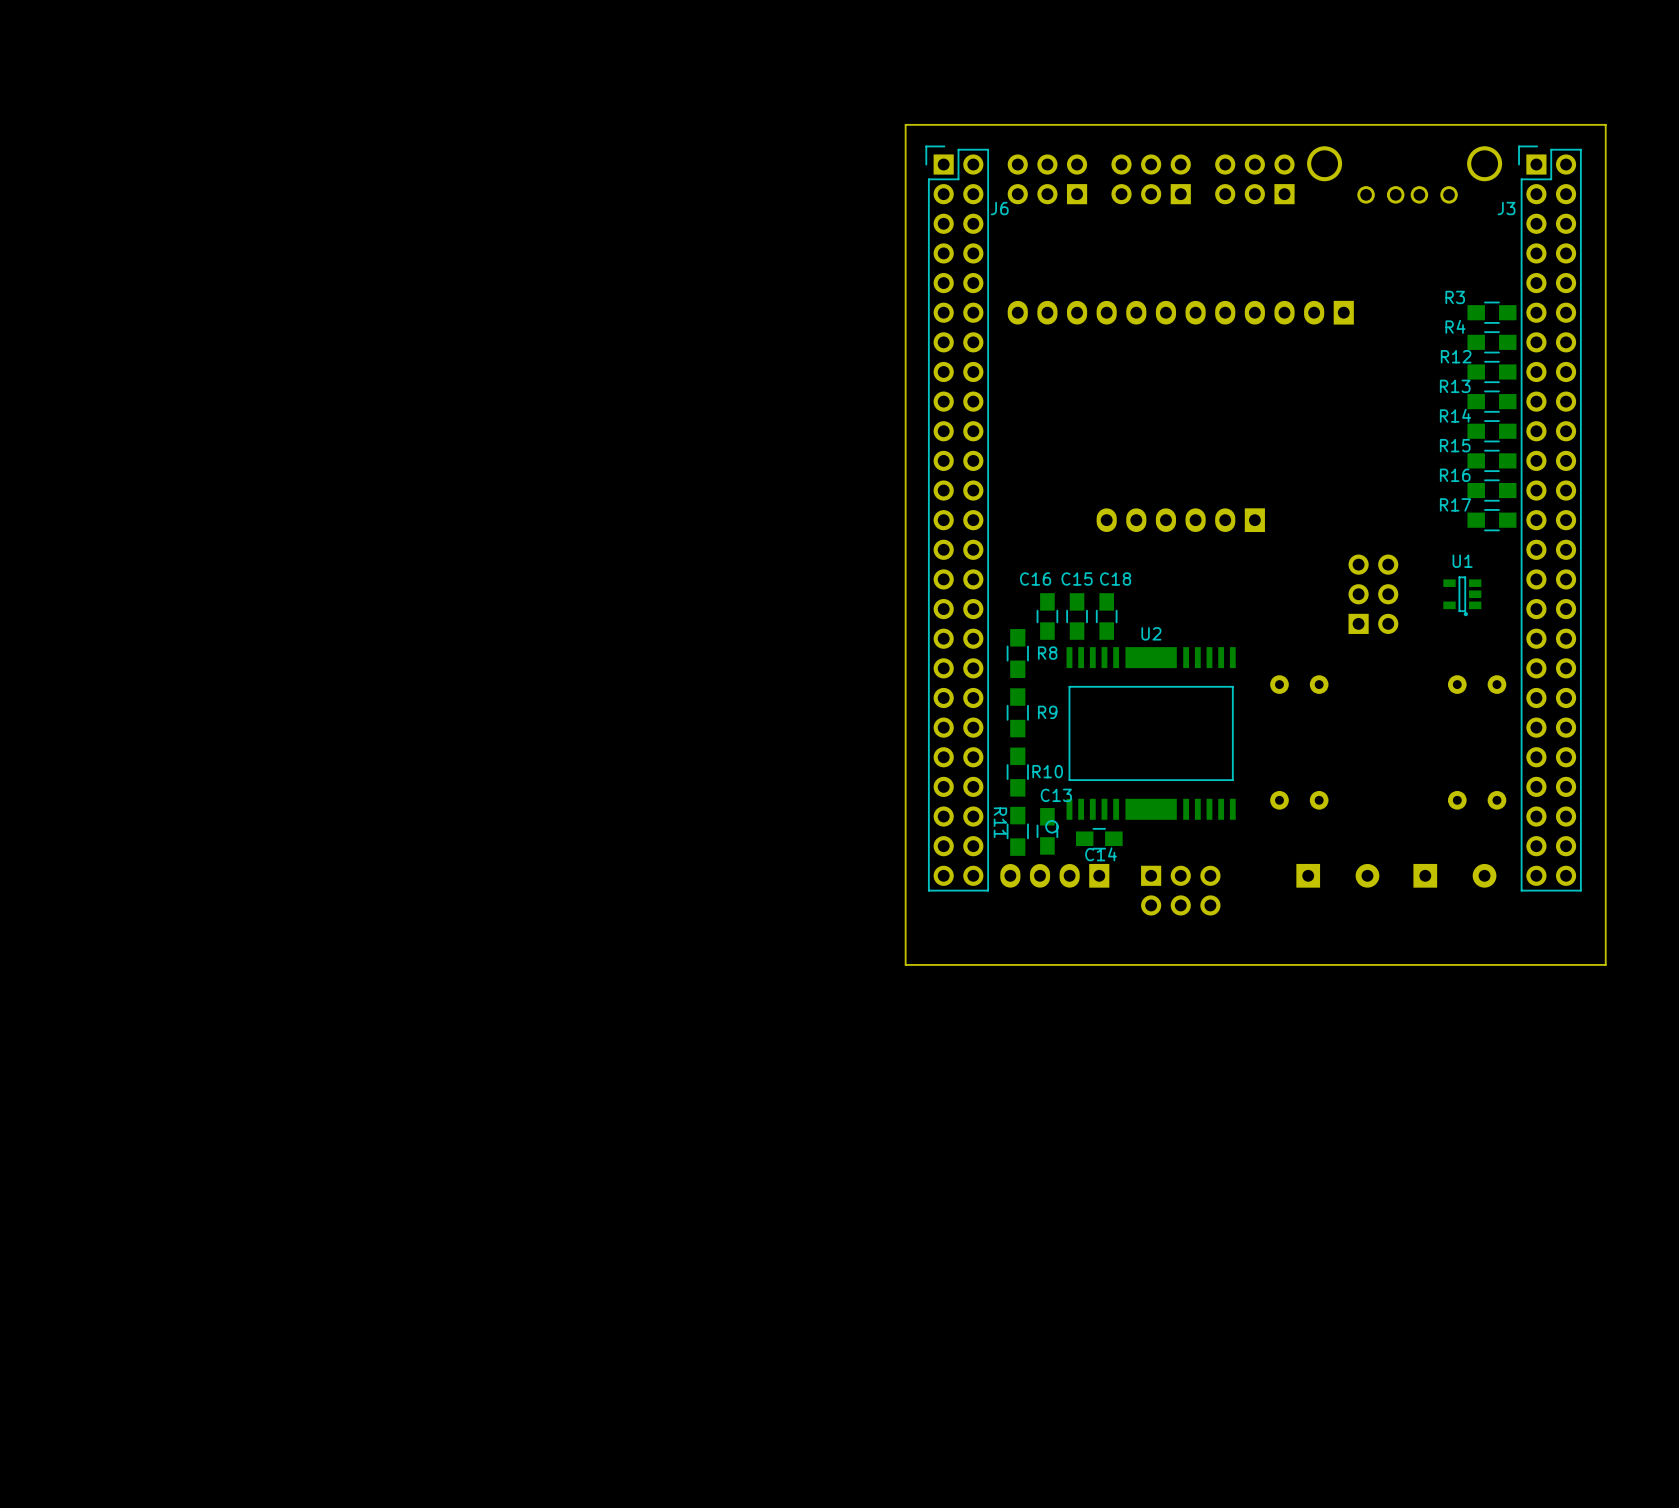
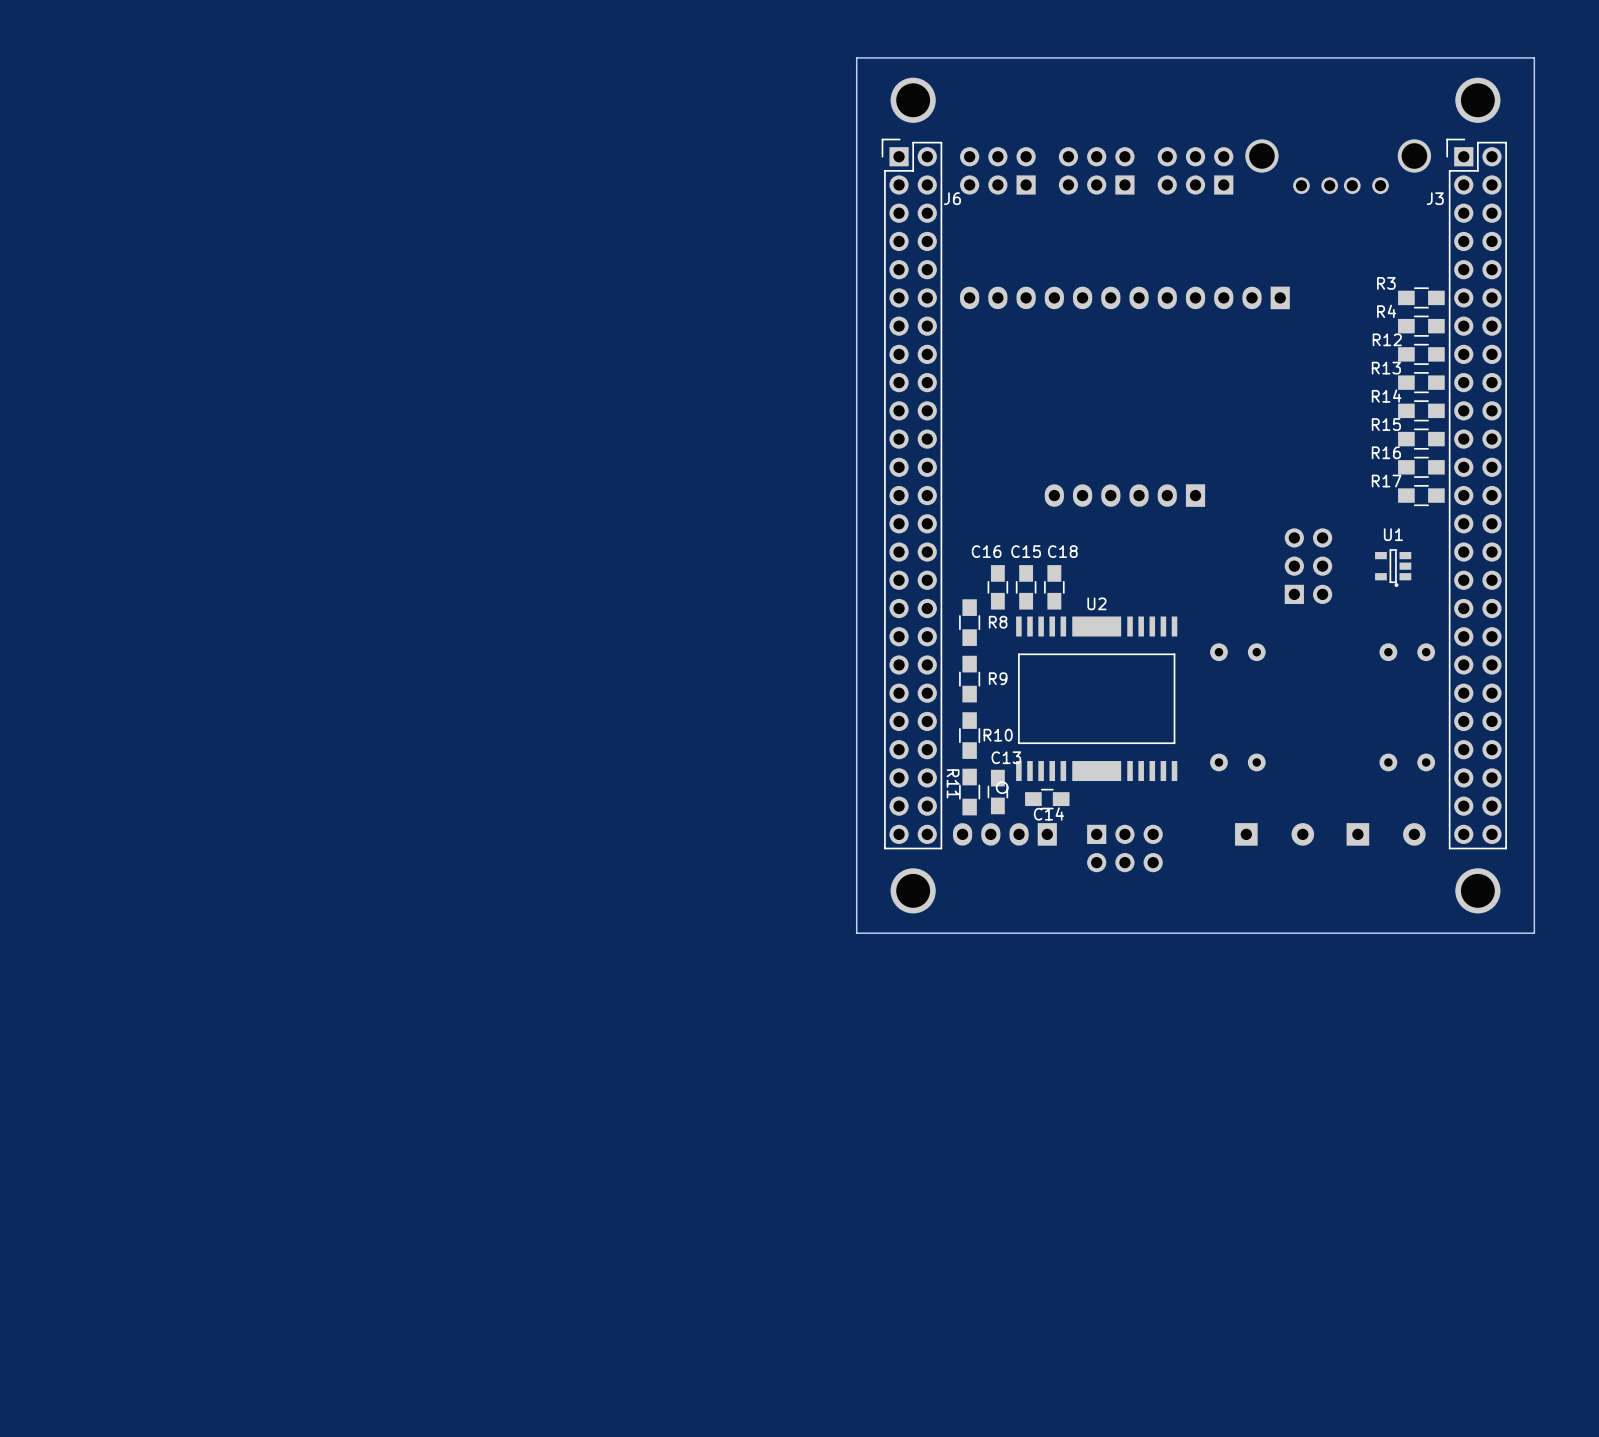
part: none -> (913, 100)
part: none -> (1477, 100)
board edge: (1605, 124) (1605, 964) (905, 964) (905, 124) (1605, 124) -> (1534, 57) (1534, 933) (856, 933) (856, 57) (1534, 57)
part: none -> (913, 890)
part: none -> (1477, 890)

